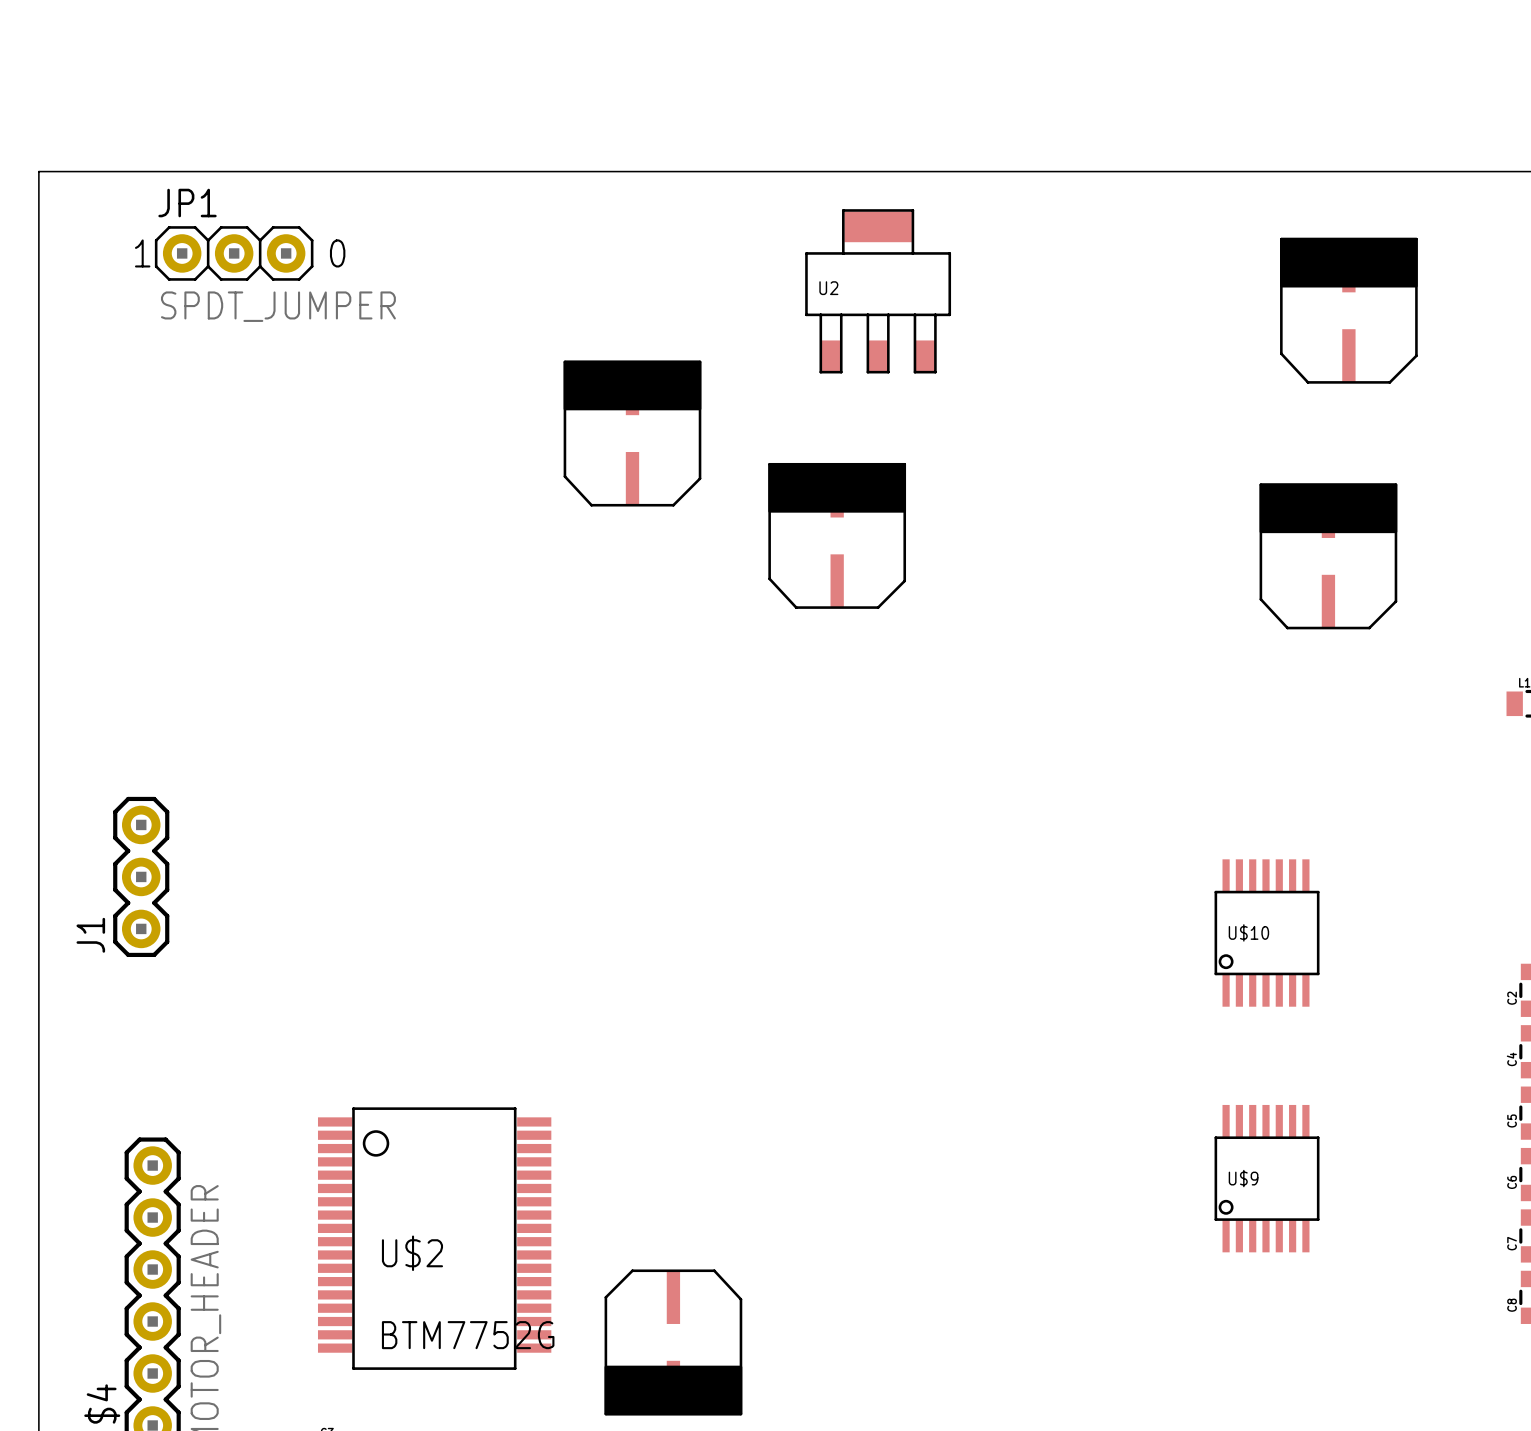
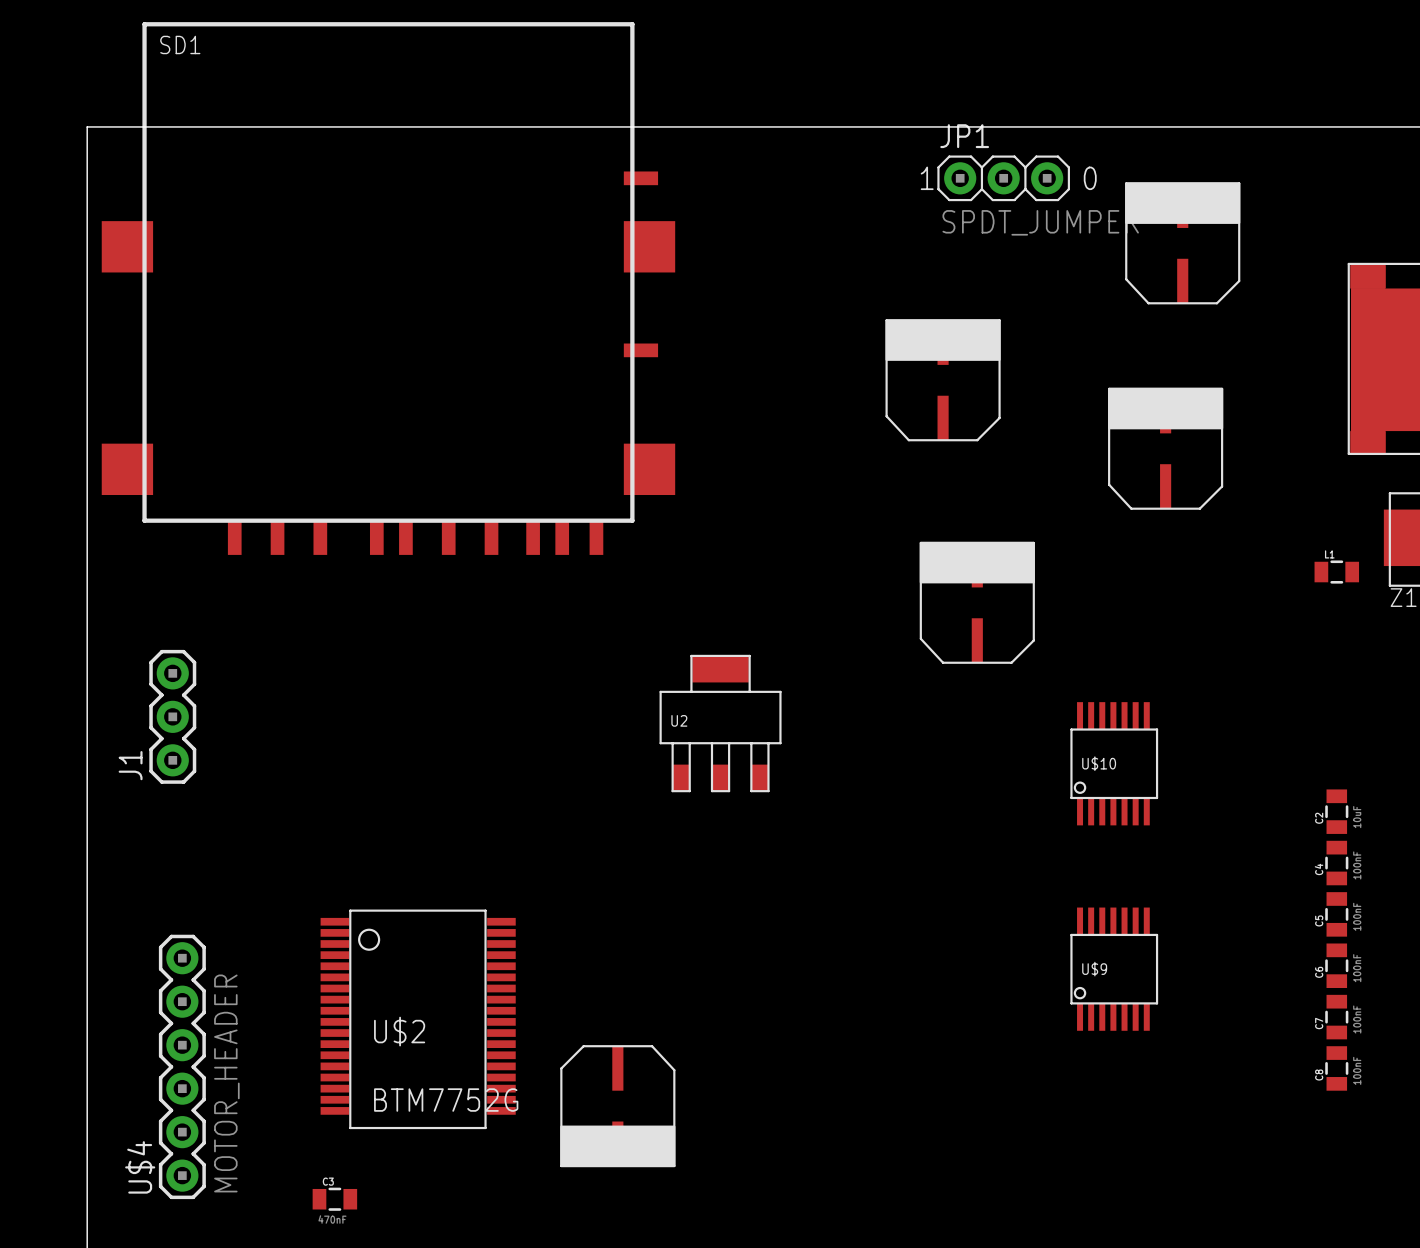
JP1 position: (234, 253) -> (1003, 178)
U2 position: (878, 291) -> (720, 723)
SD1: none -> (388, 288)
part: (632, 433) -> none
part: none -> (943, 380)
part: (837, 535) -> none
part: none -> (977, 602)

